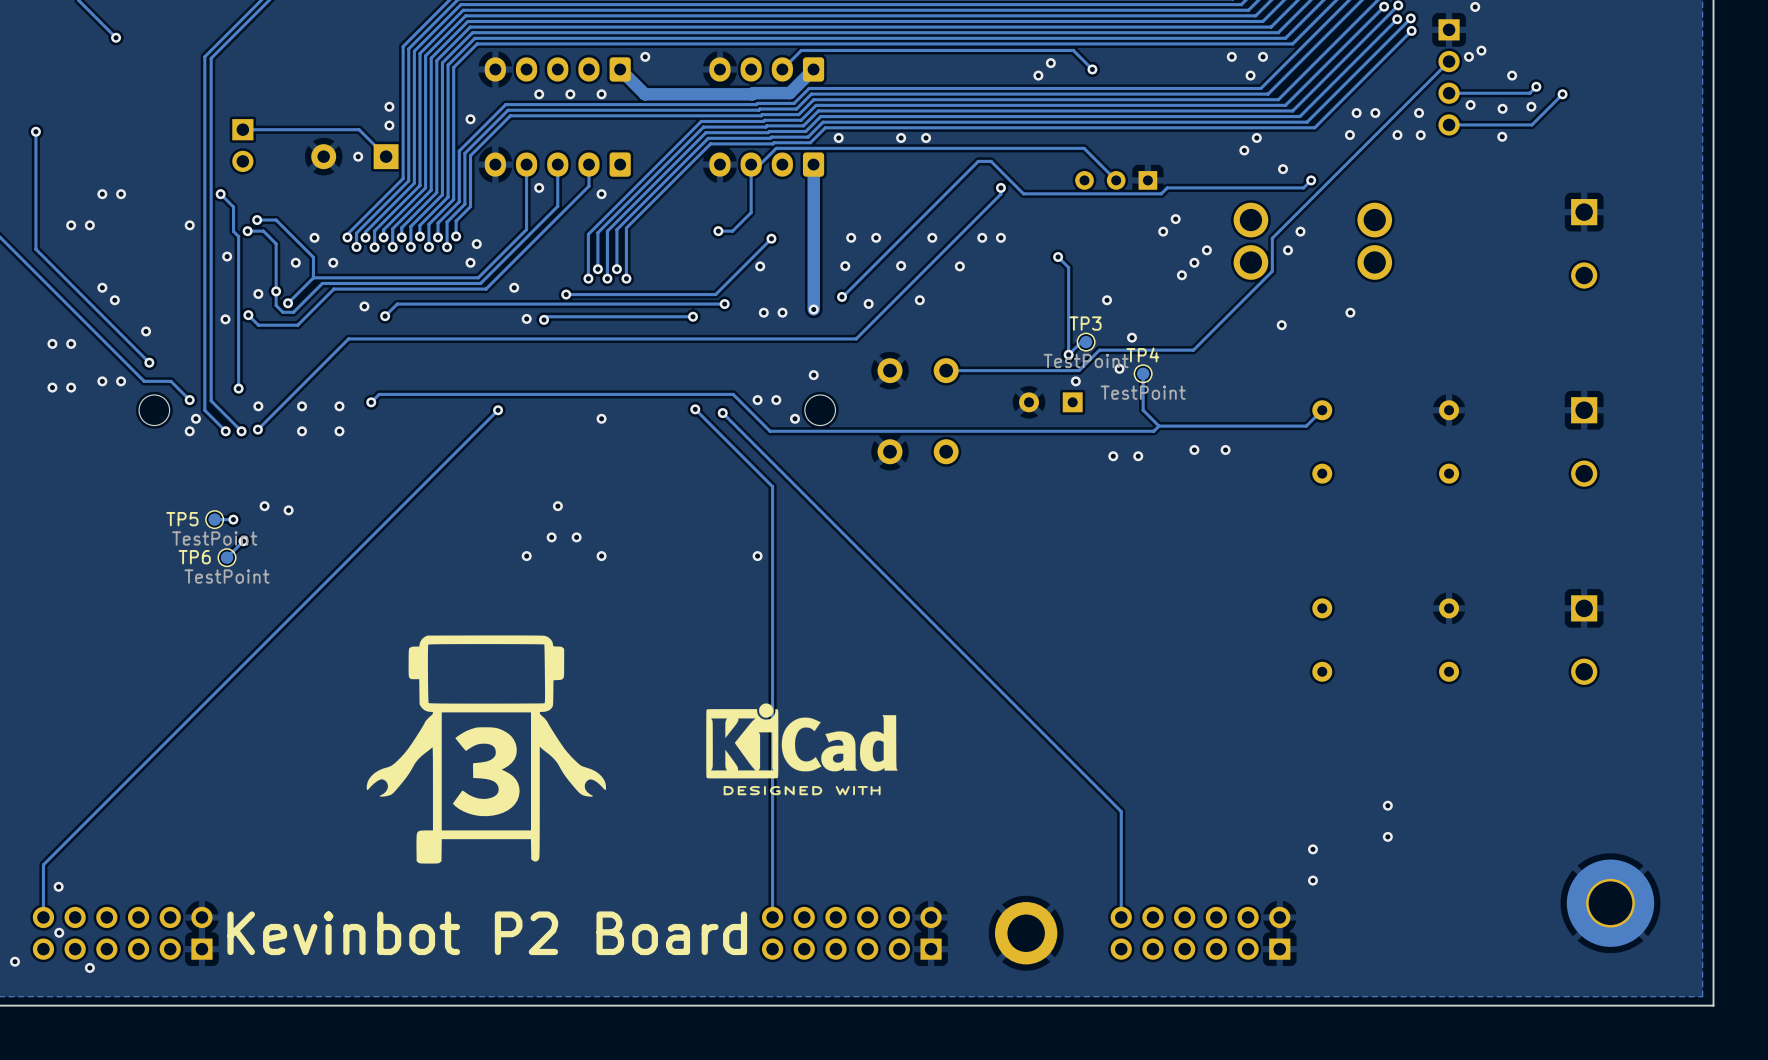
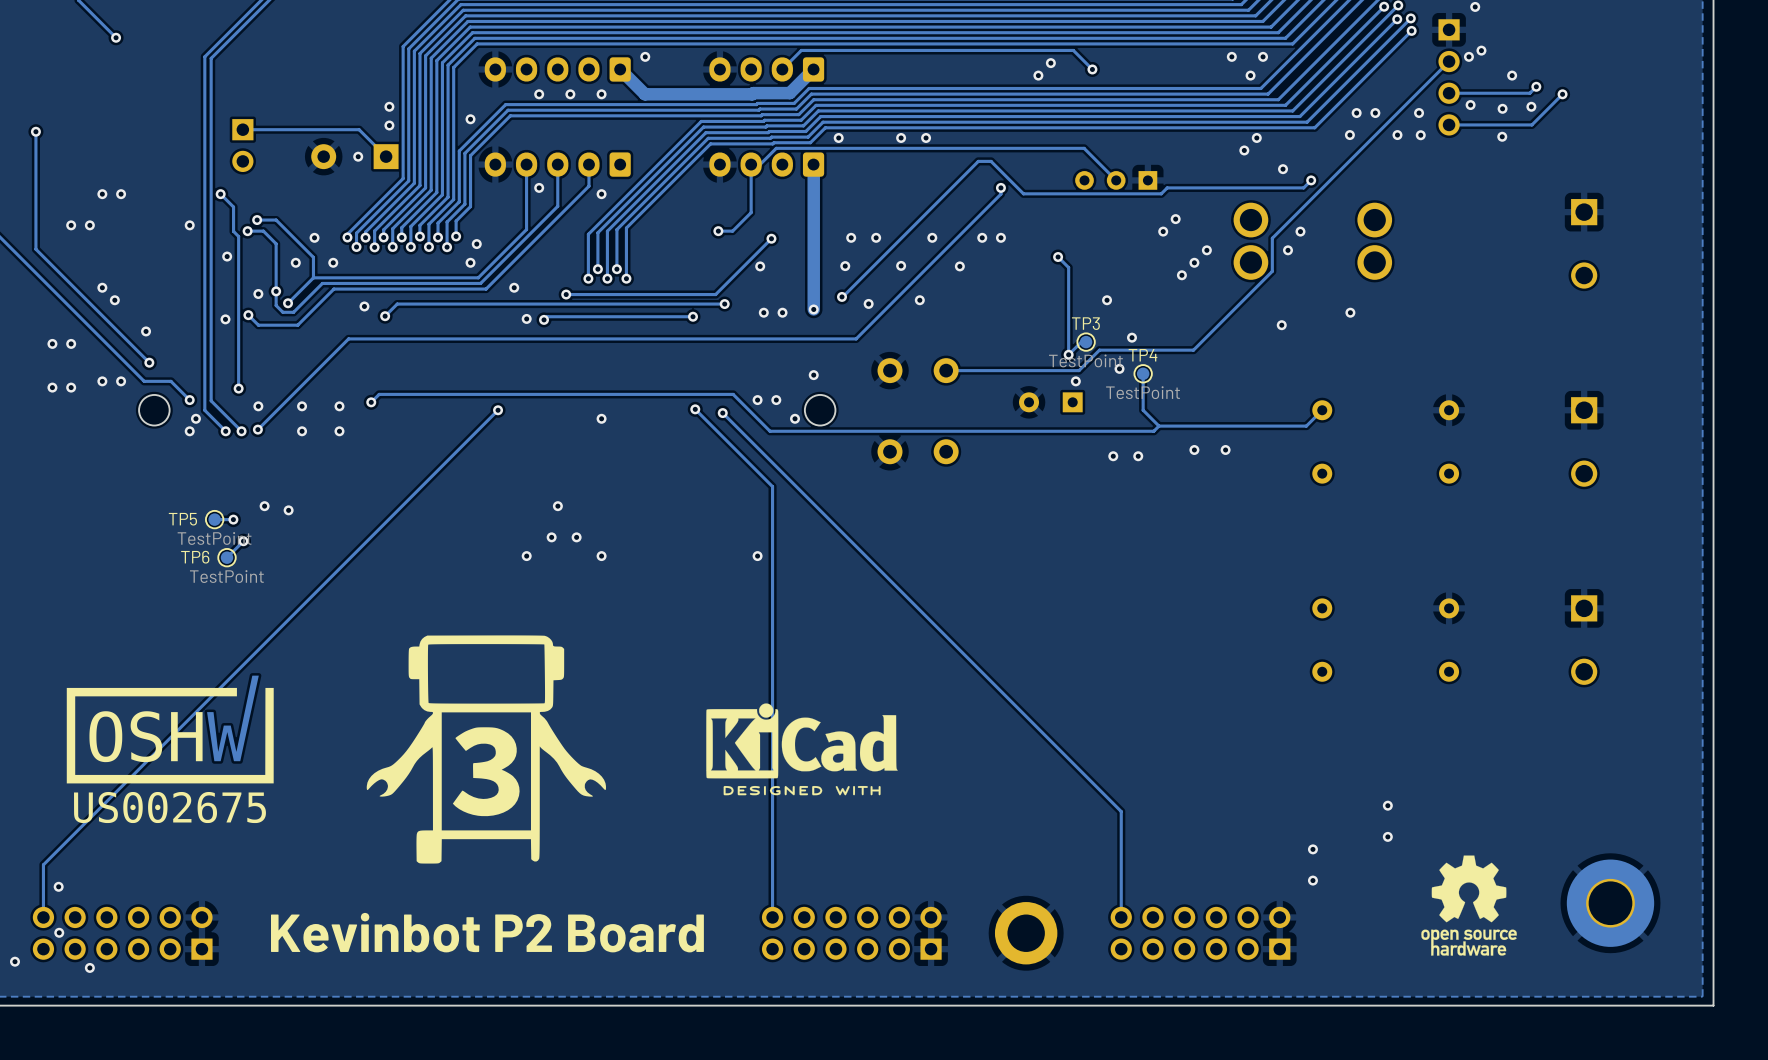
drawing: none -> [66, 675, 274, 824]
drawing: none -> [1421, 855, 1517, 956]

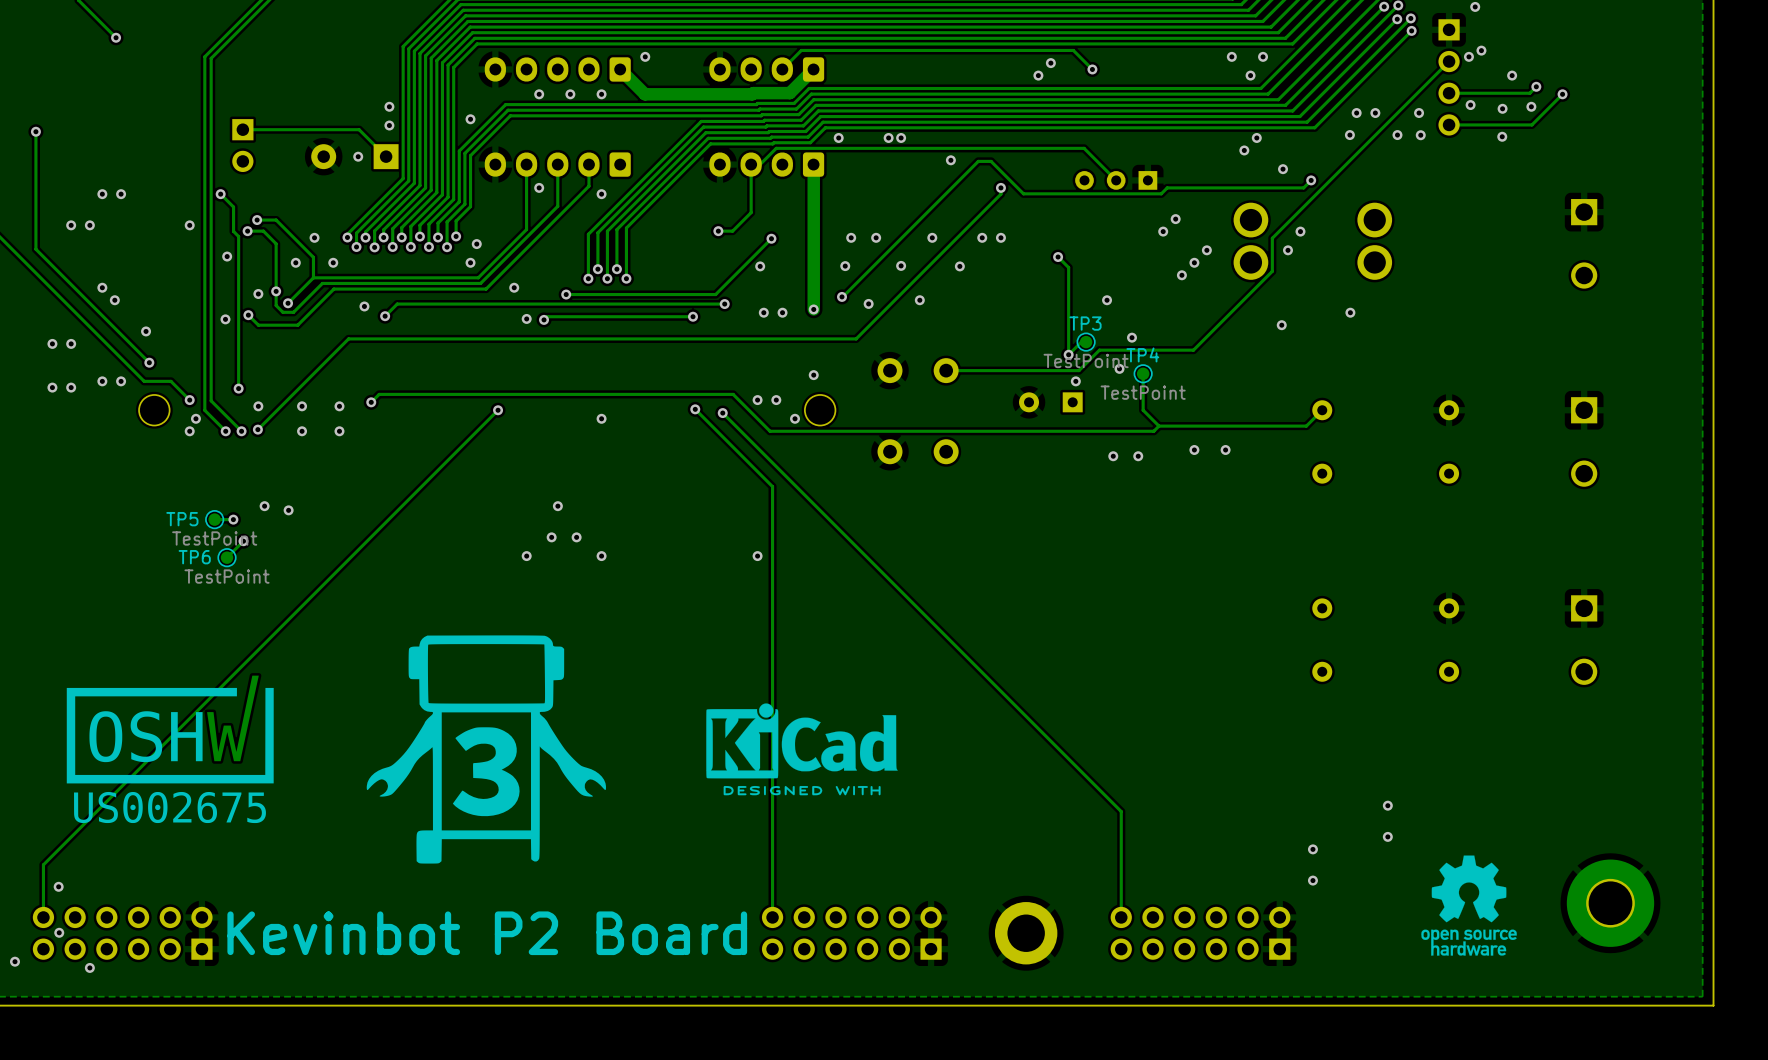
via: none -> (888, 137)
via: (926, 137) -> none
via: none -> (950, 160)

